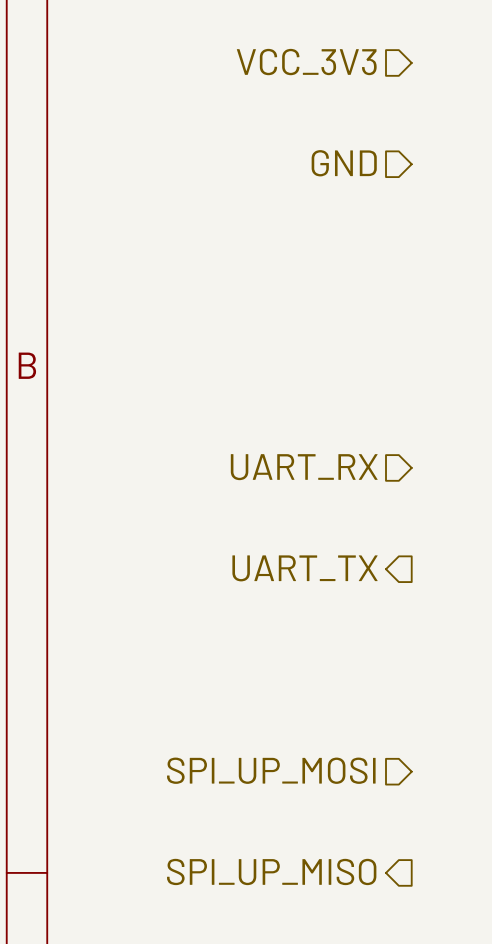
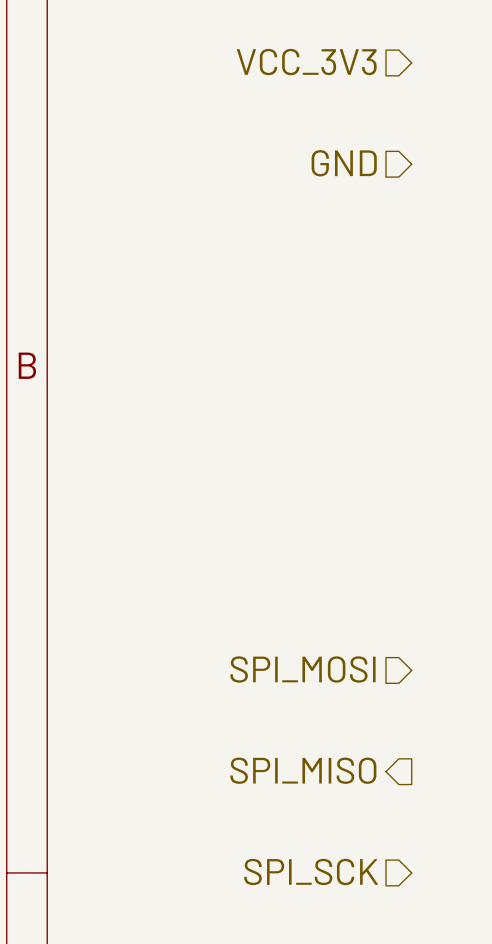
hierarchical label: UART_RX (304, 467) -> none
hierarchical label: UART_TX (305, 568) -> none
hierarchical label: none -> SPI_MOSI (302, 669)
hierarchical label shape: input (271, 770) -> output (303, 770)
hierarchical label: SPI_UP_MOSI (271, 770) -> SPI_MISO (303, 770)
hierarchical label shape: output (271, 871) -> input (311, 872)
hierarchical label: SPI_UP_MISO (271, 871) -> SPI_SCK (311, 872)

